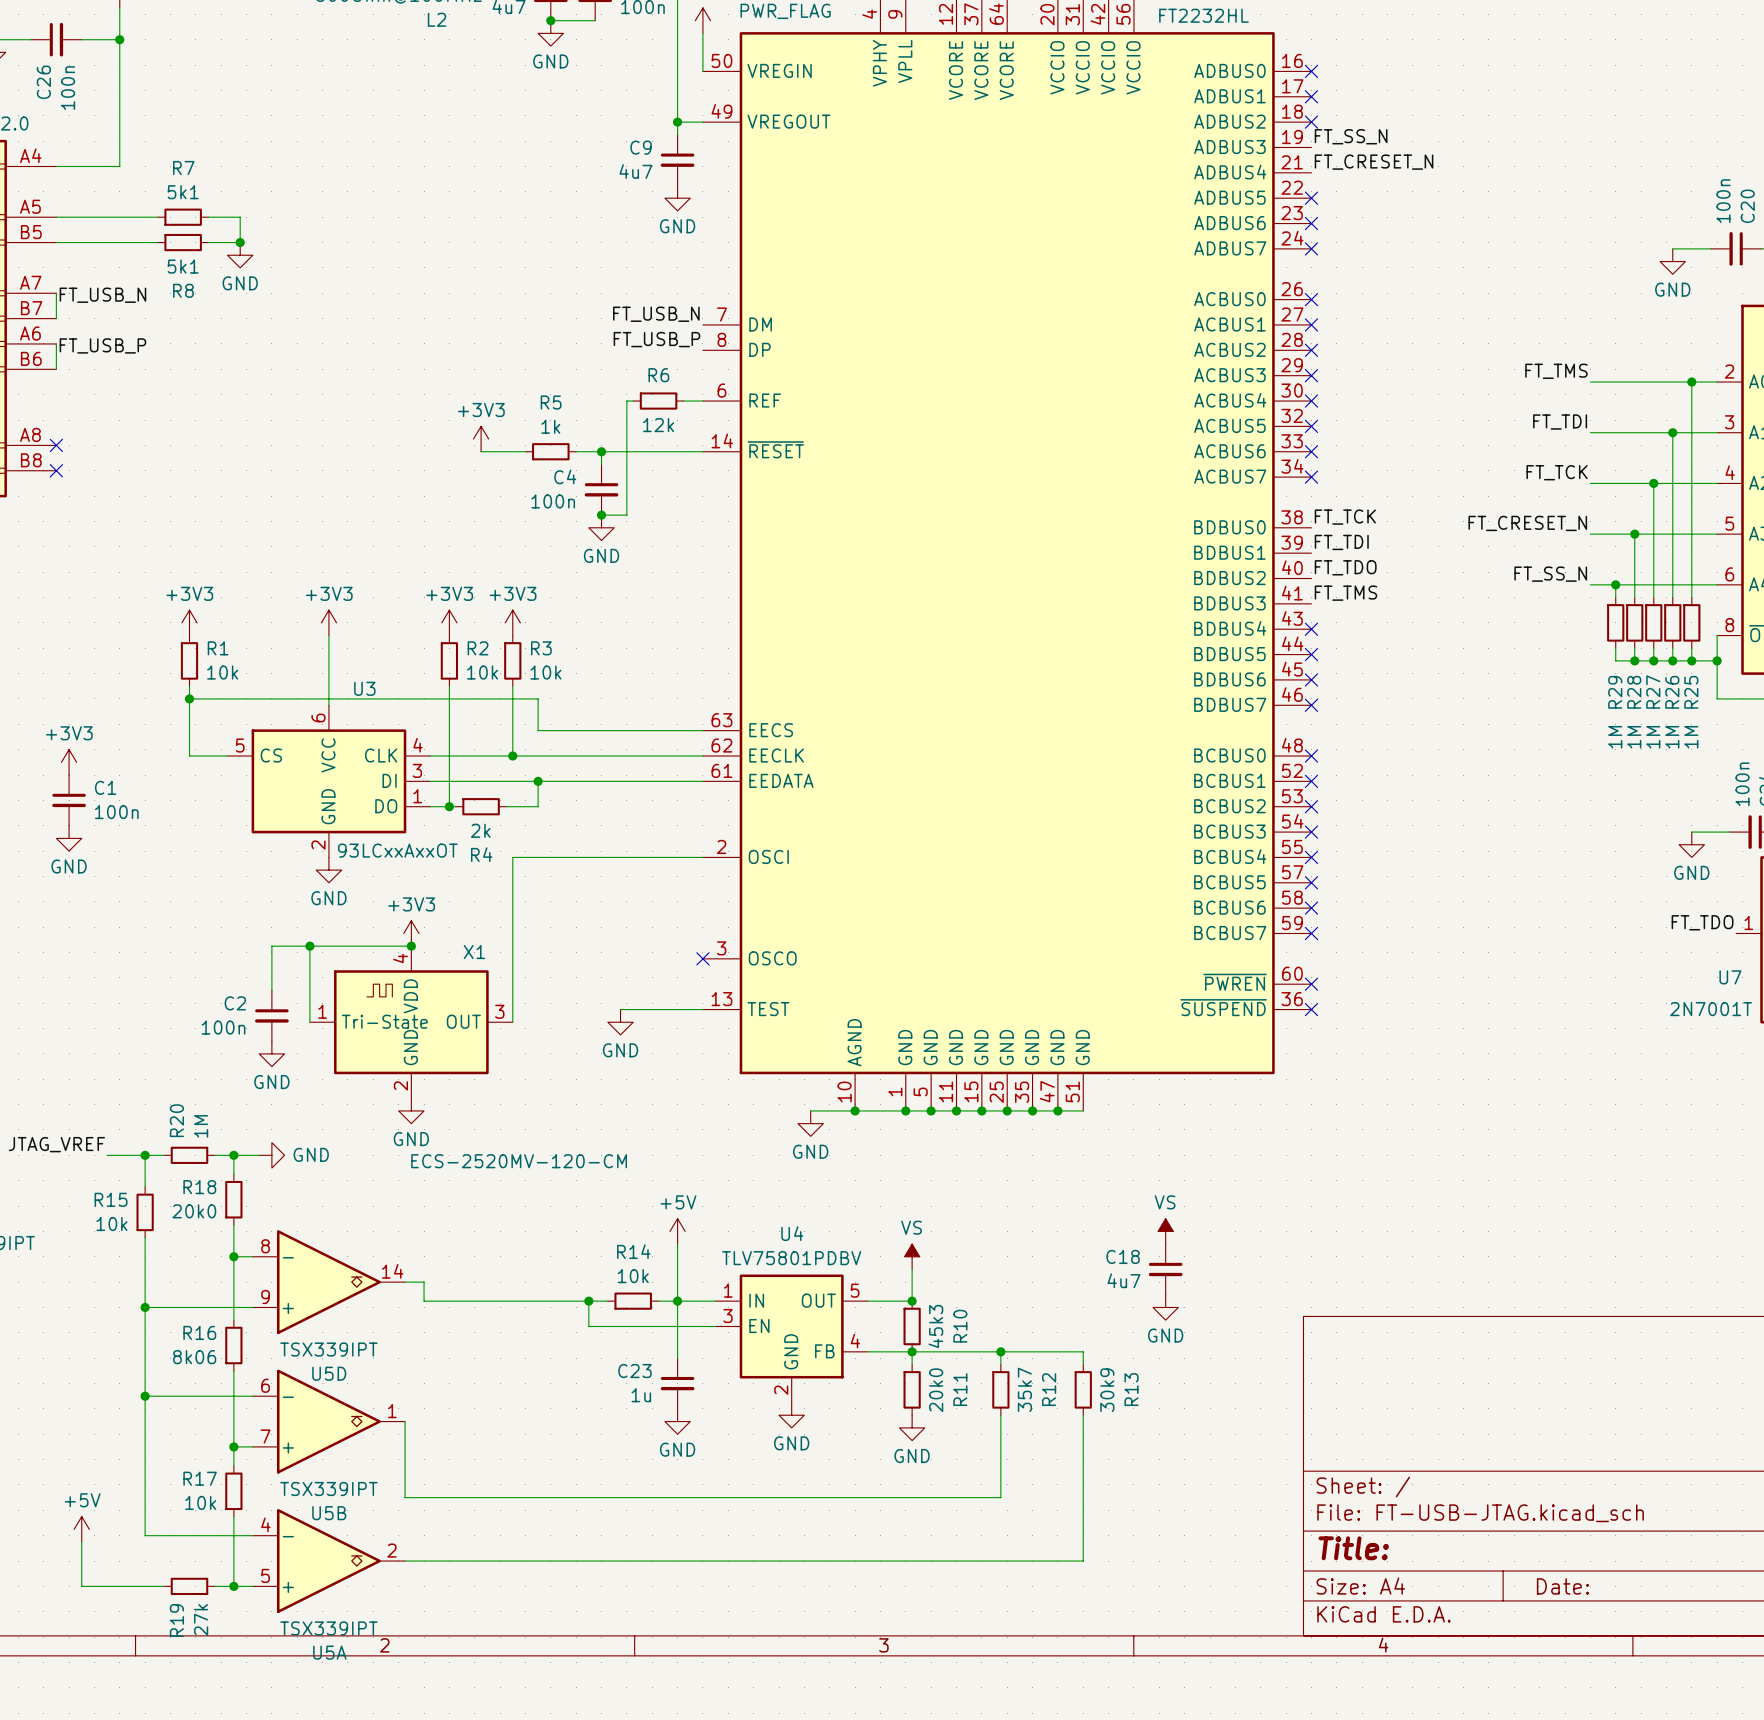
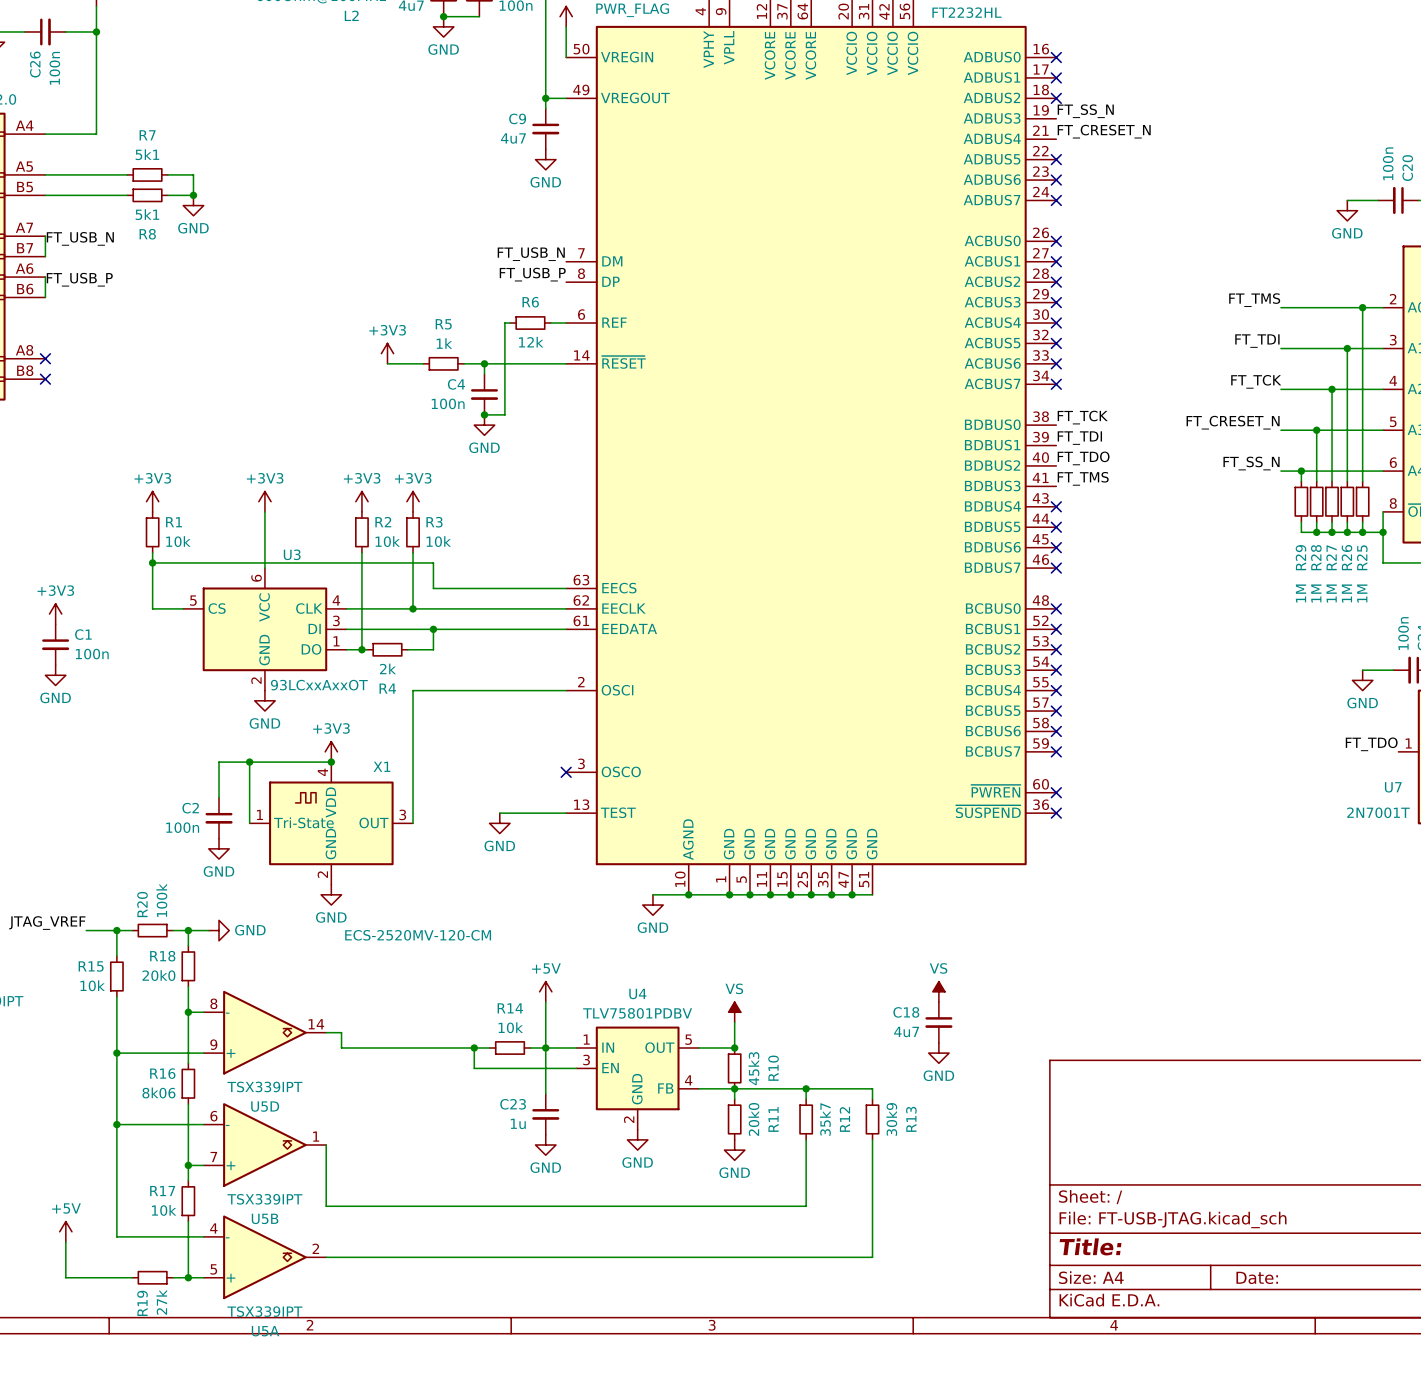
R20 value: 1M (201, 1126) -> 100k (161, 900)

